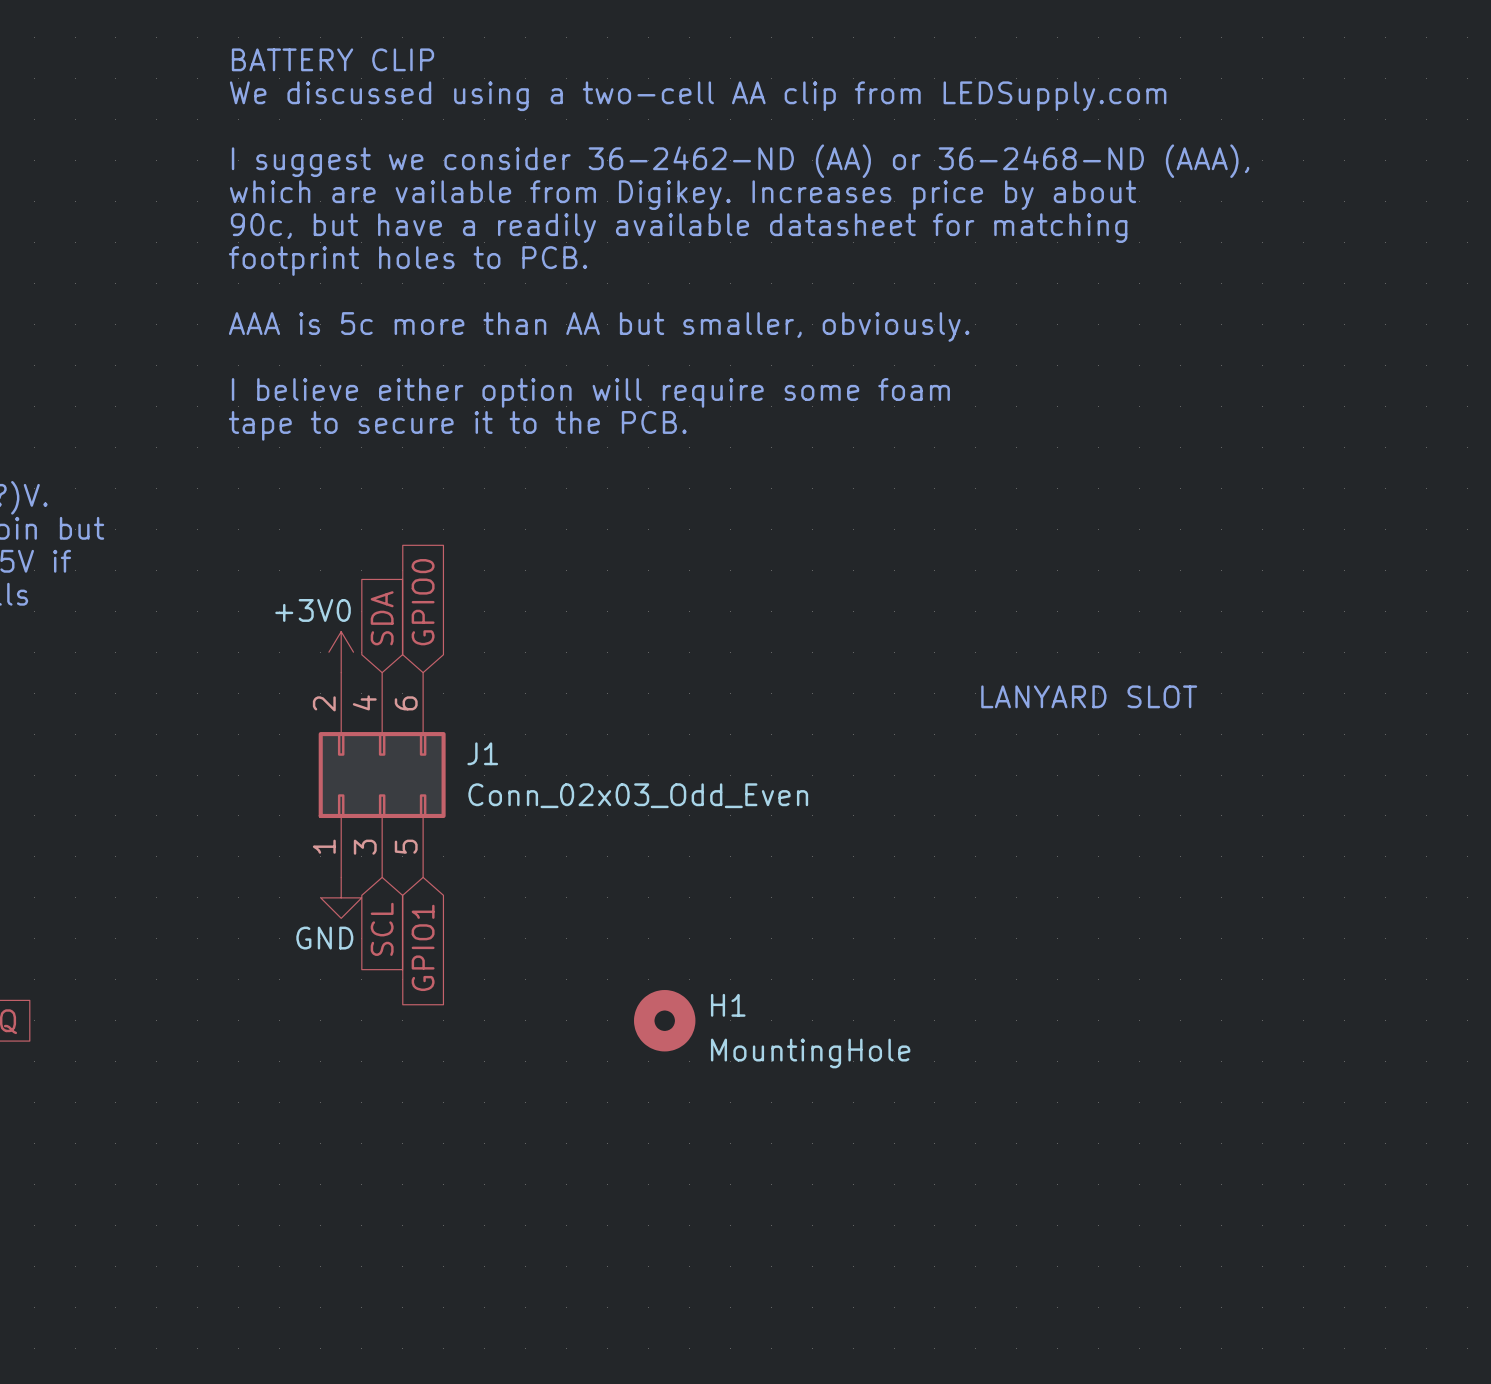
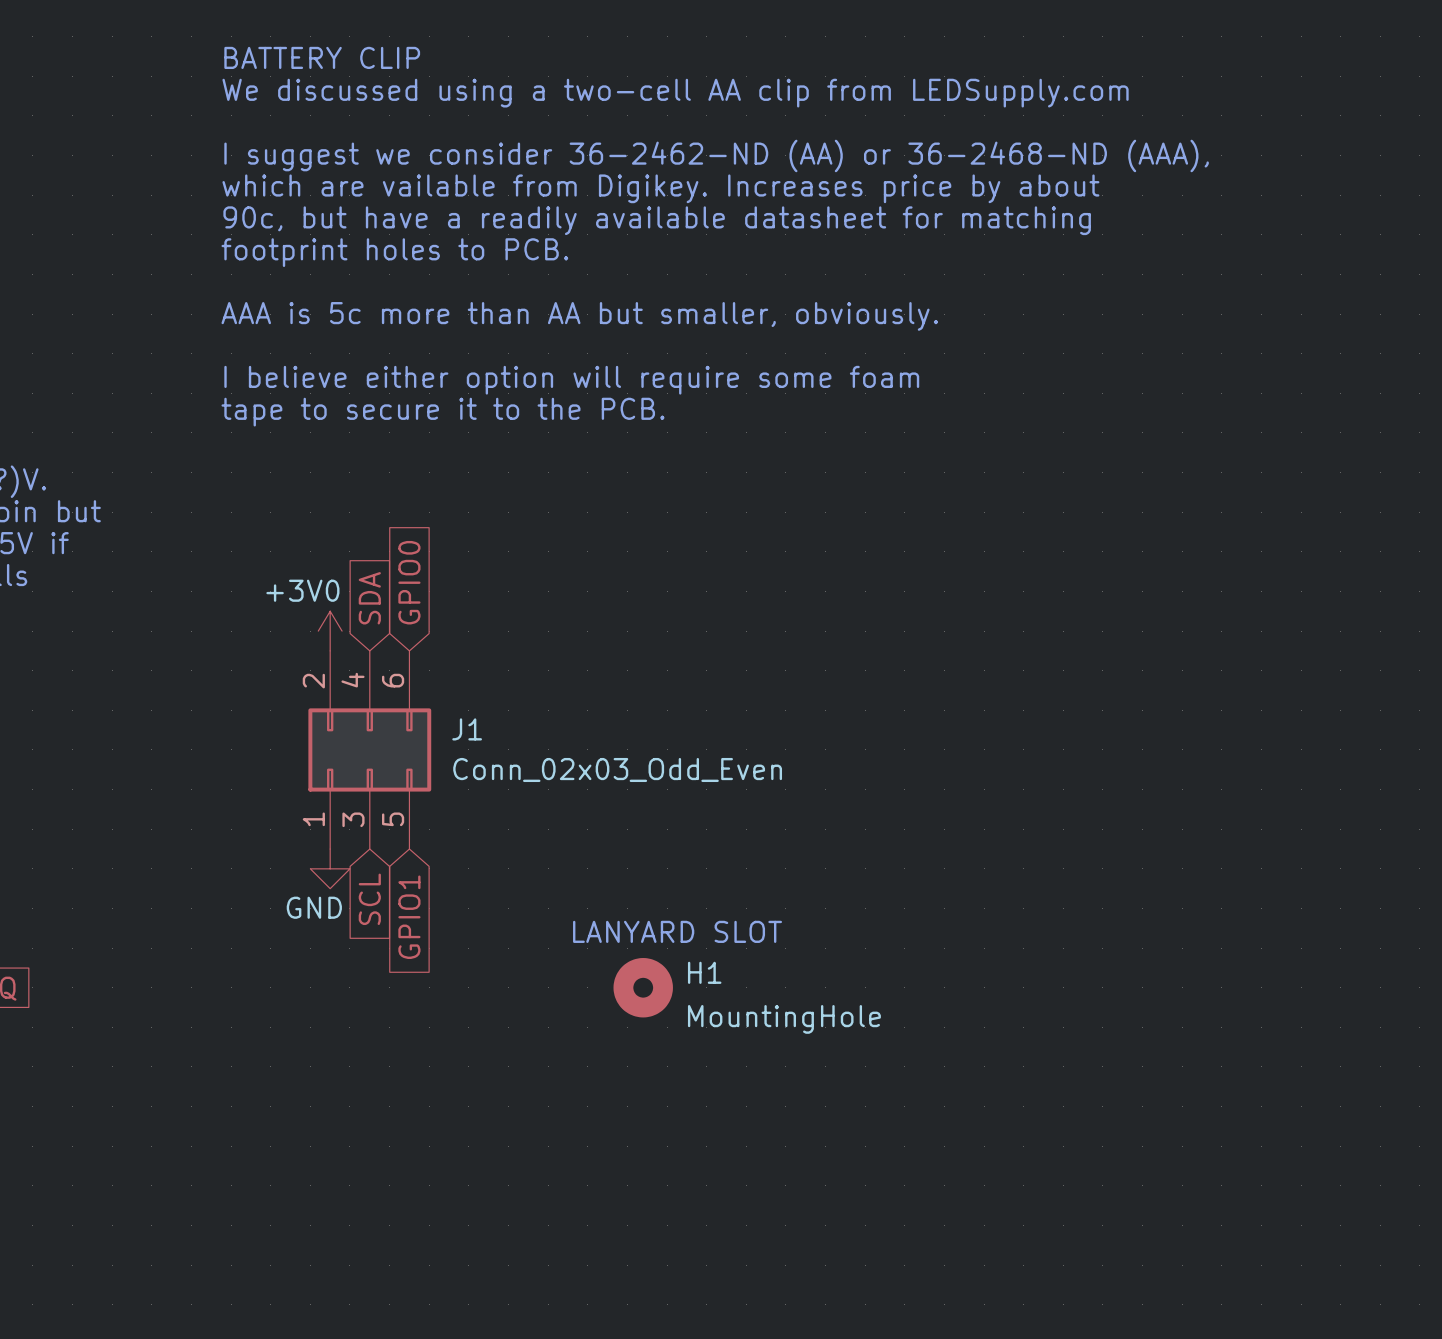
text: LANYARD SLOT (1089, 696) -> none
text: none -> LANYARD SLOT (677, 931)

